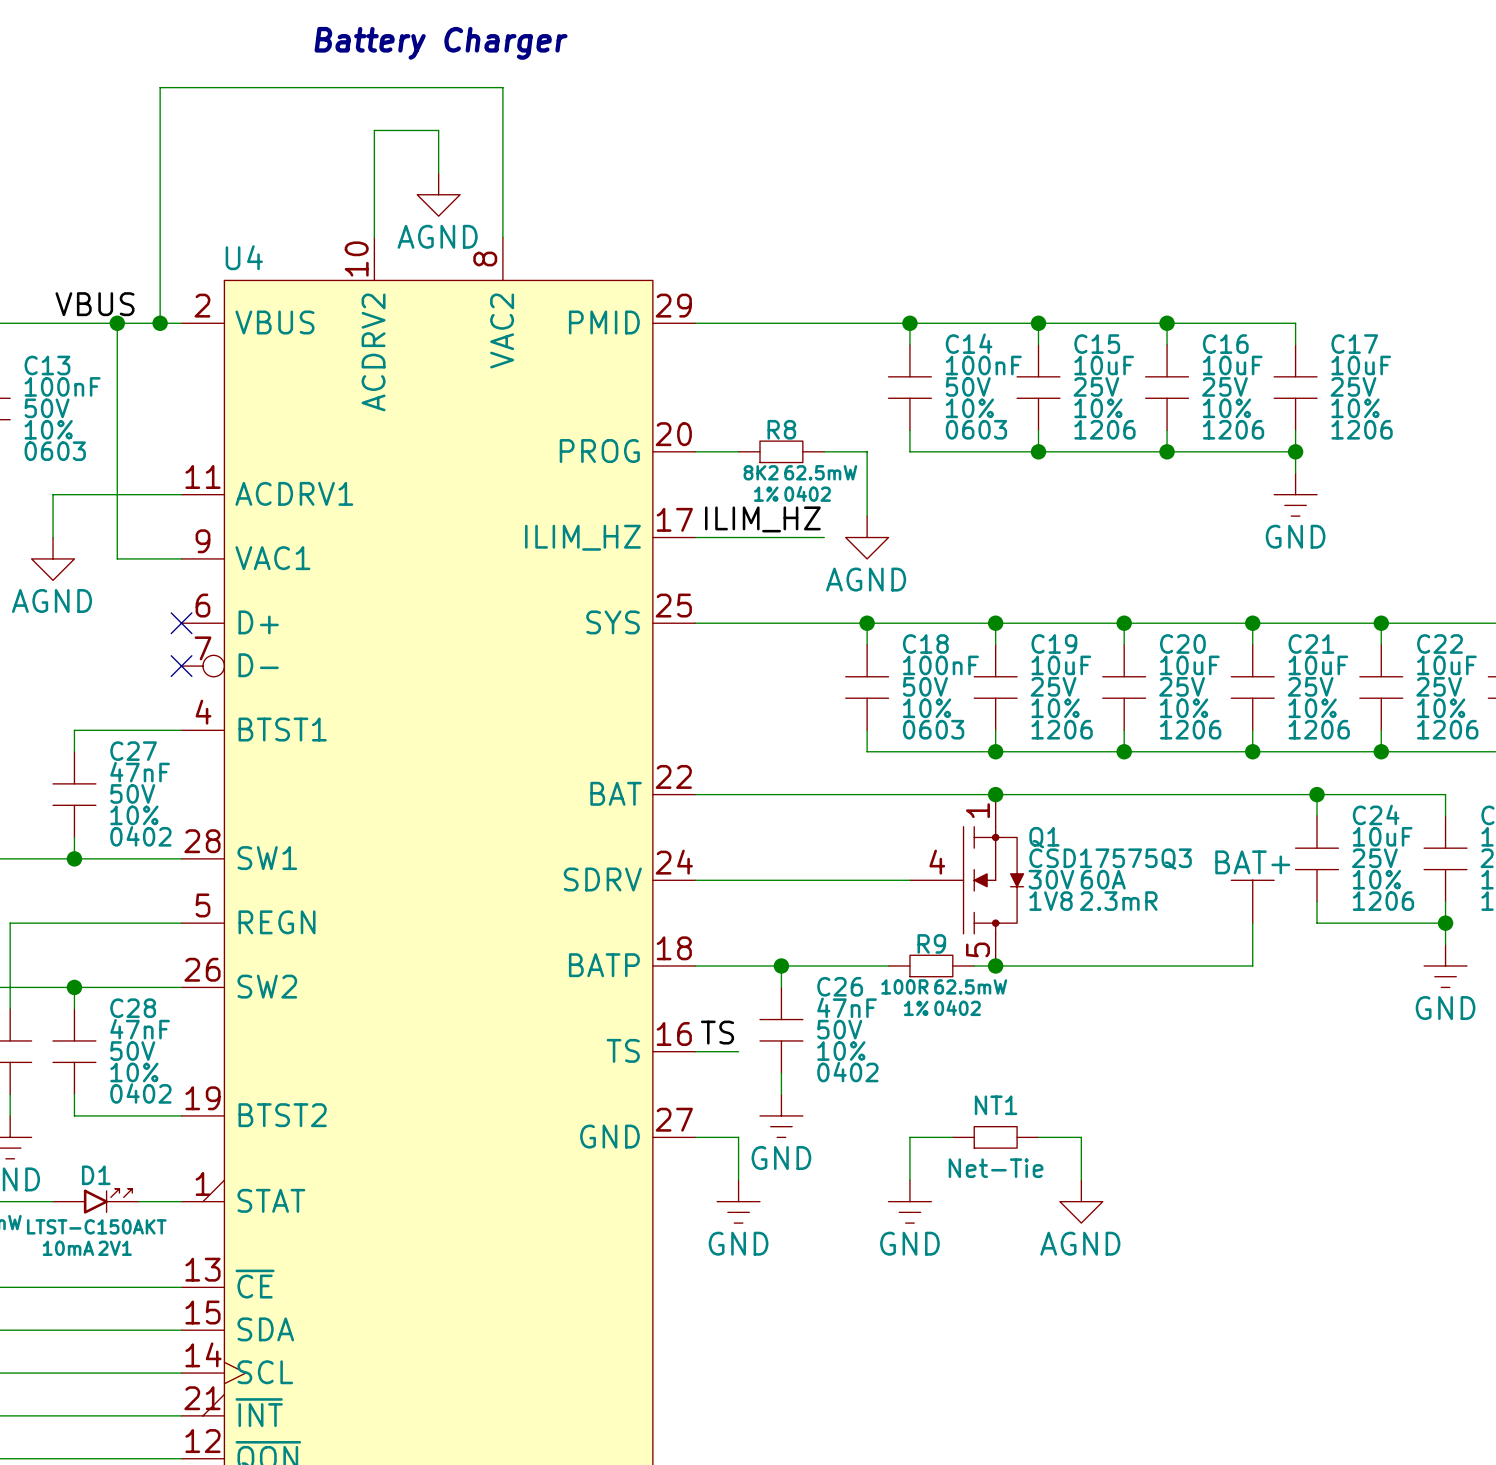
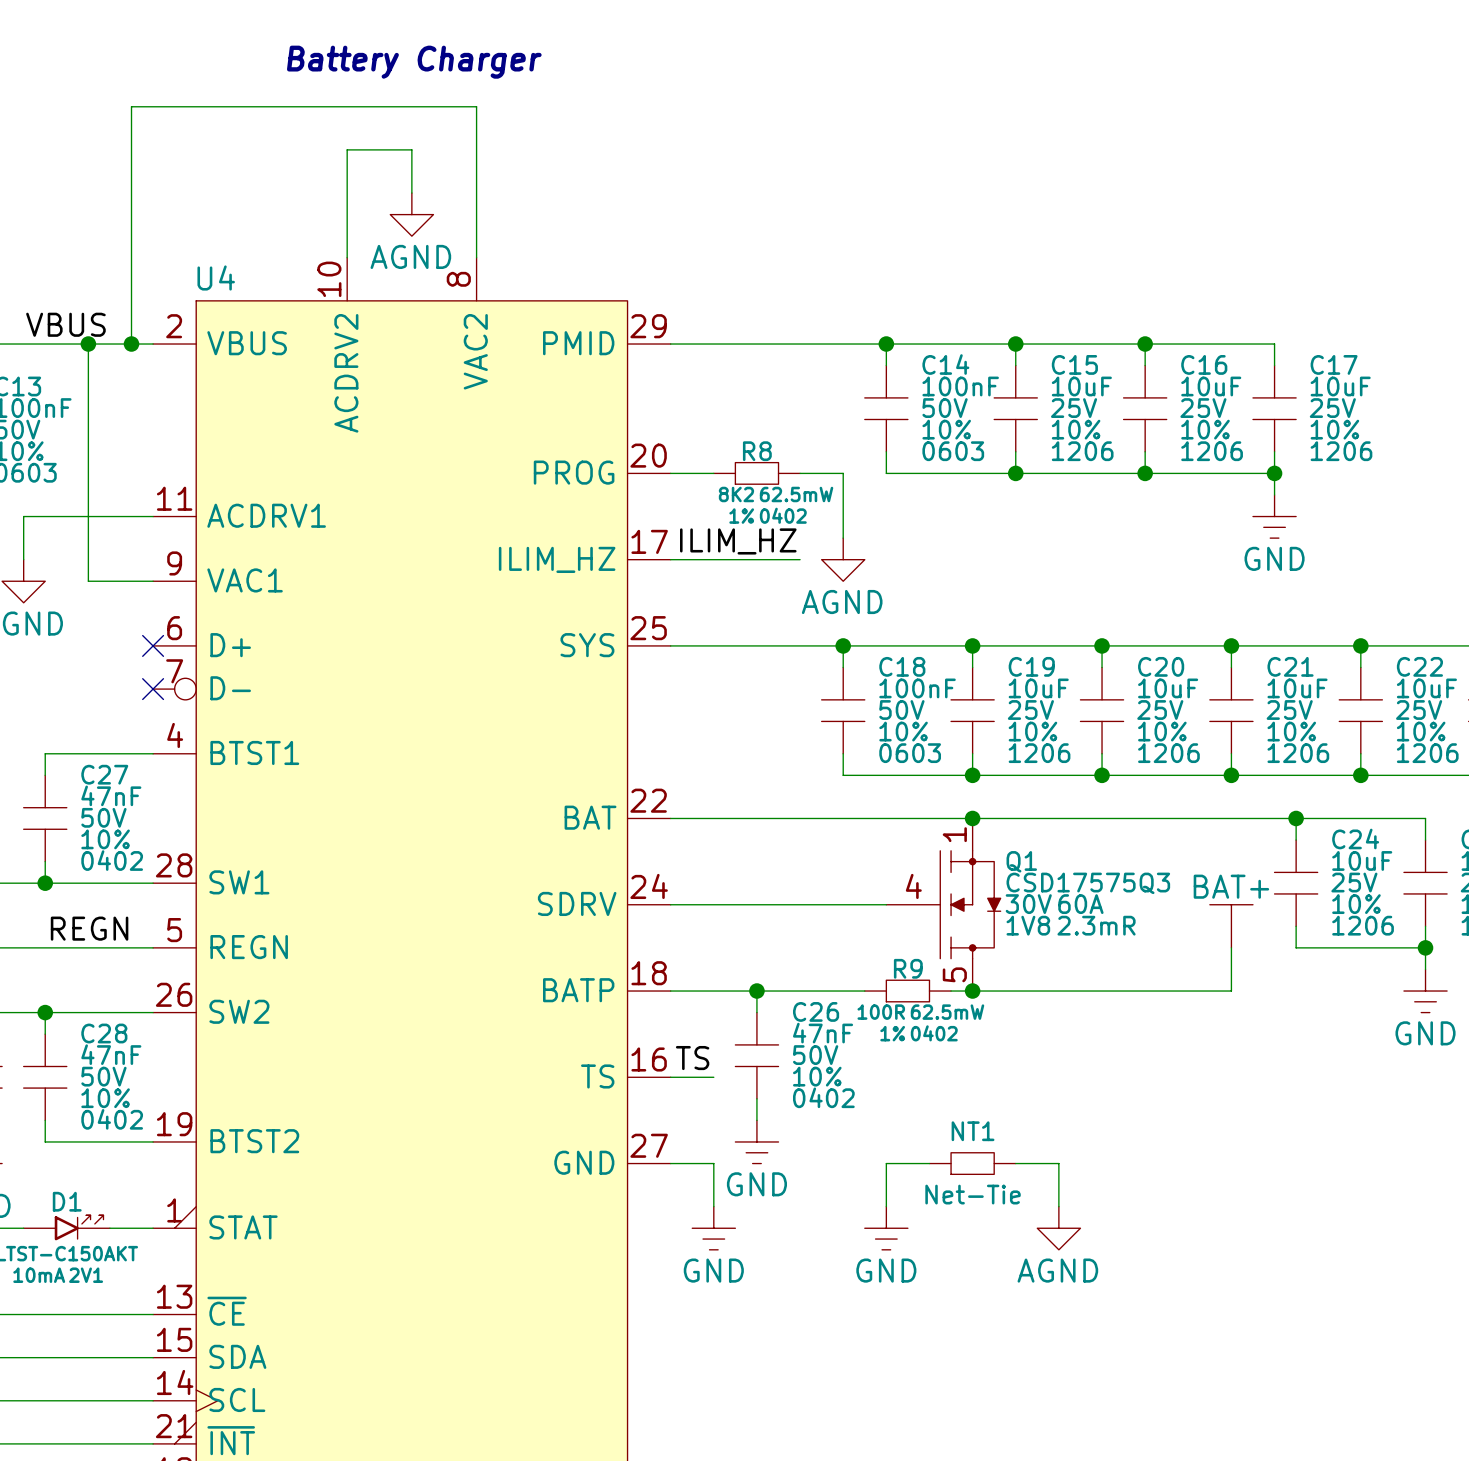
label: none -> REGN (89, 928)

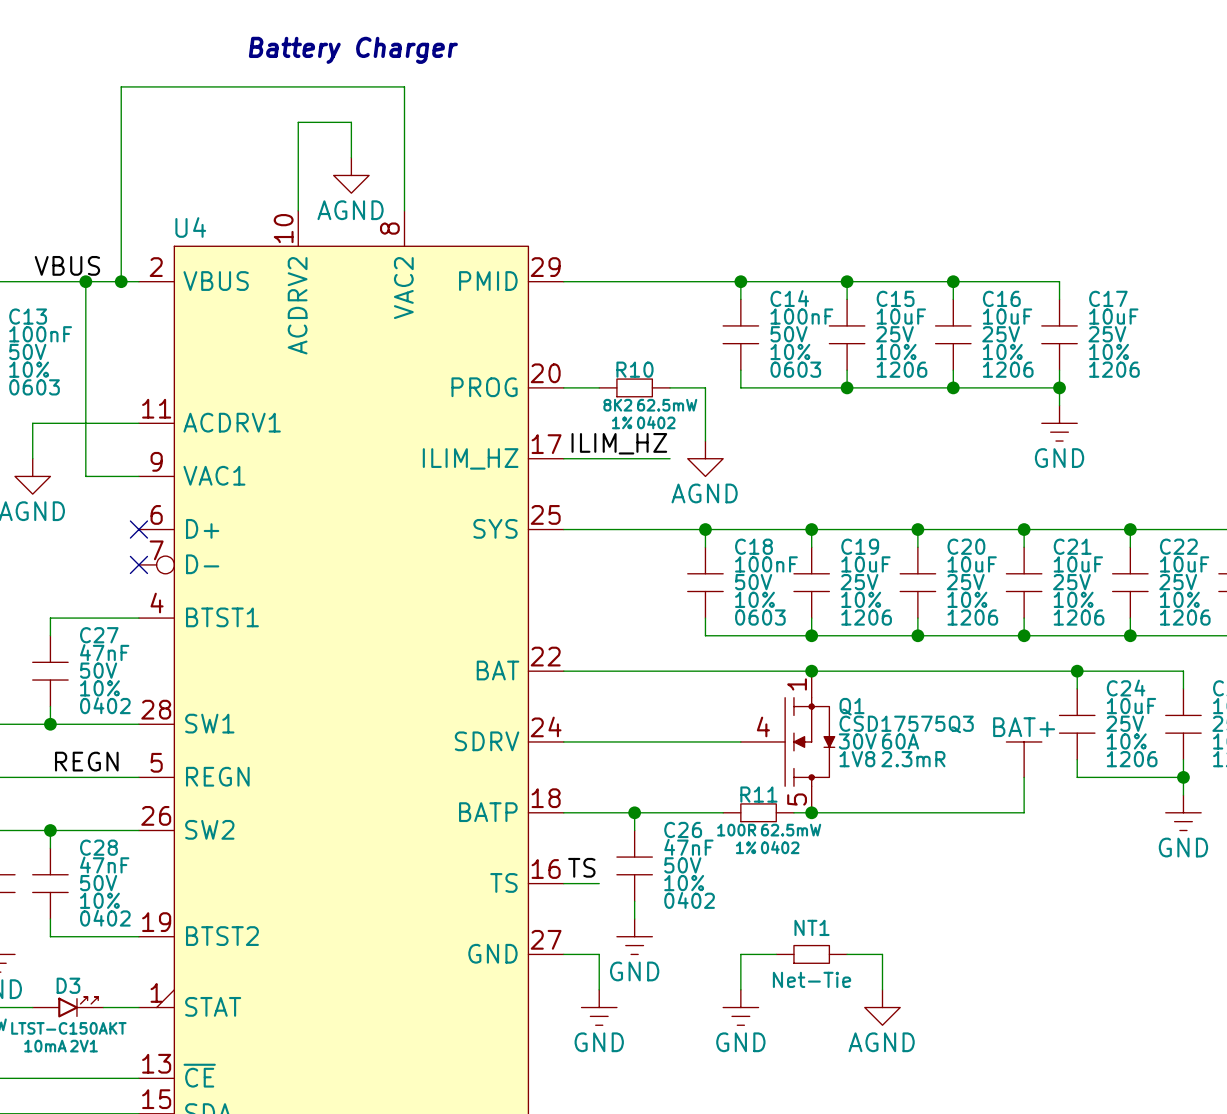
R8 name: R8 (757, 451) -> R10 (634, 369)
R9 name: R9 (908, 968) -> R11 (758, 794)
D1 name: D1 (67, 1201) -> D3 (68, 985)

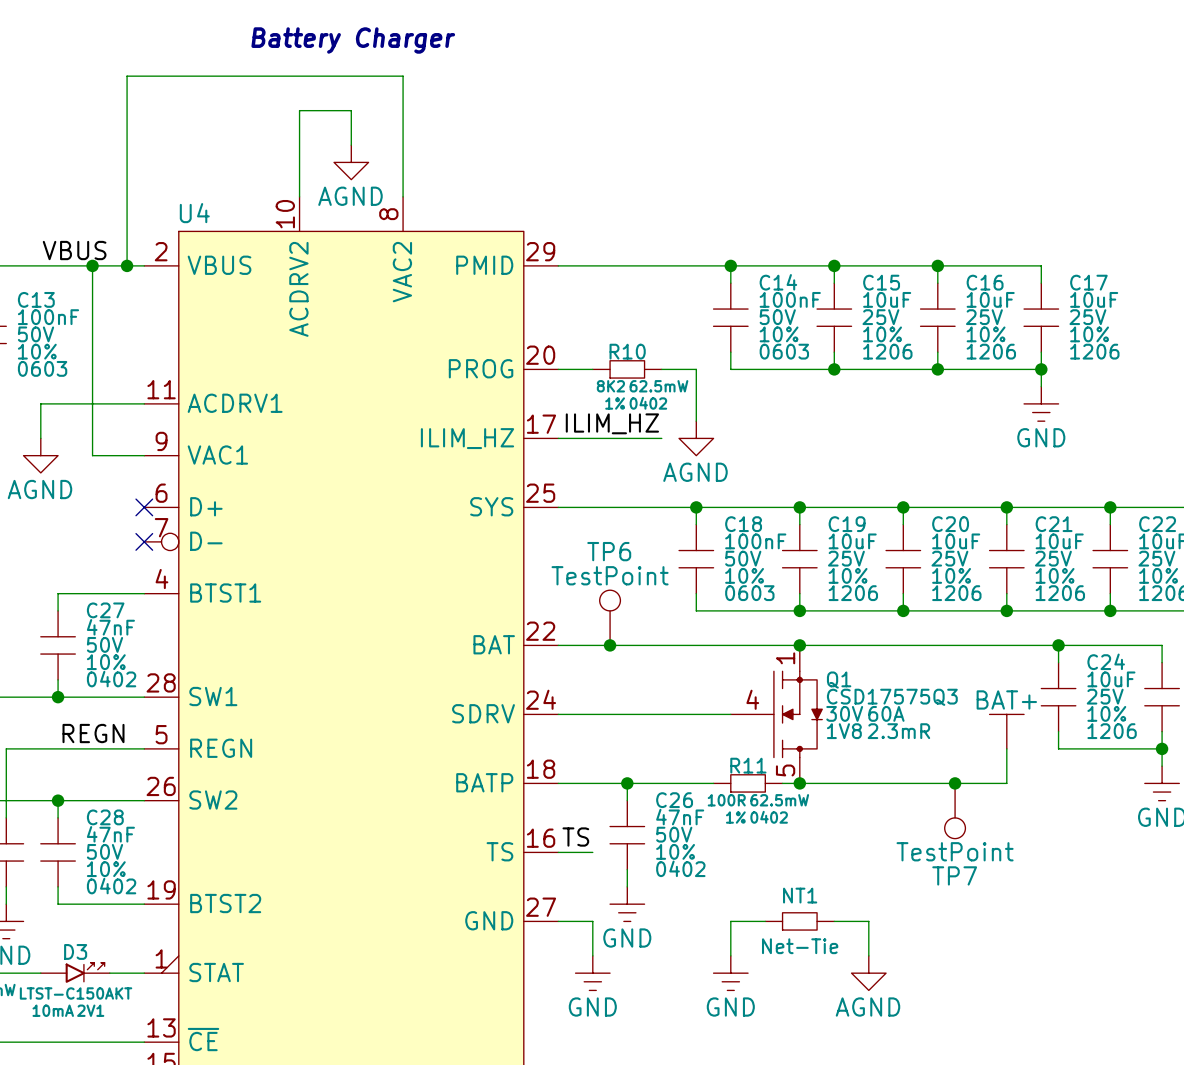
TP6: none -> TestPoint (610, 617)
junction: none -> (610, 645)
junction: none -> (955, 783)
TP7: none -> TestPoint (955, 811)

